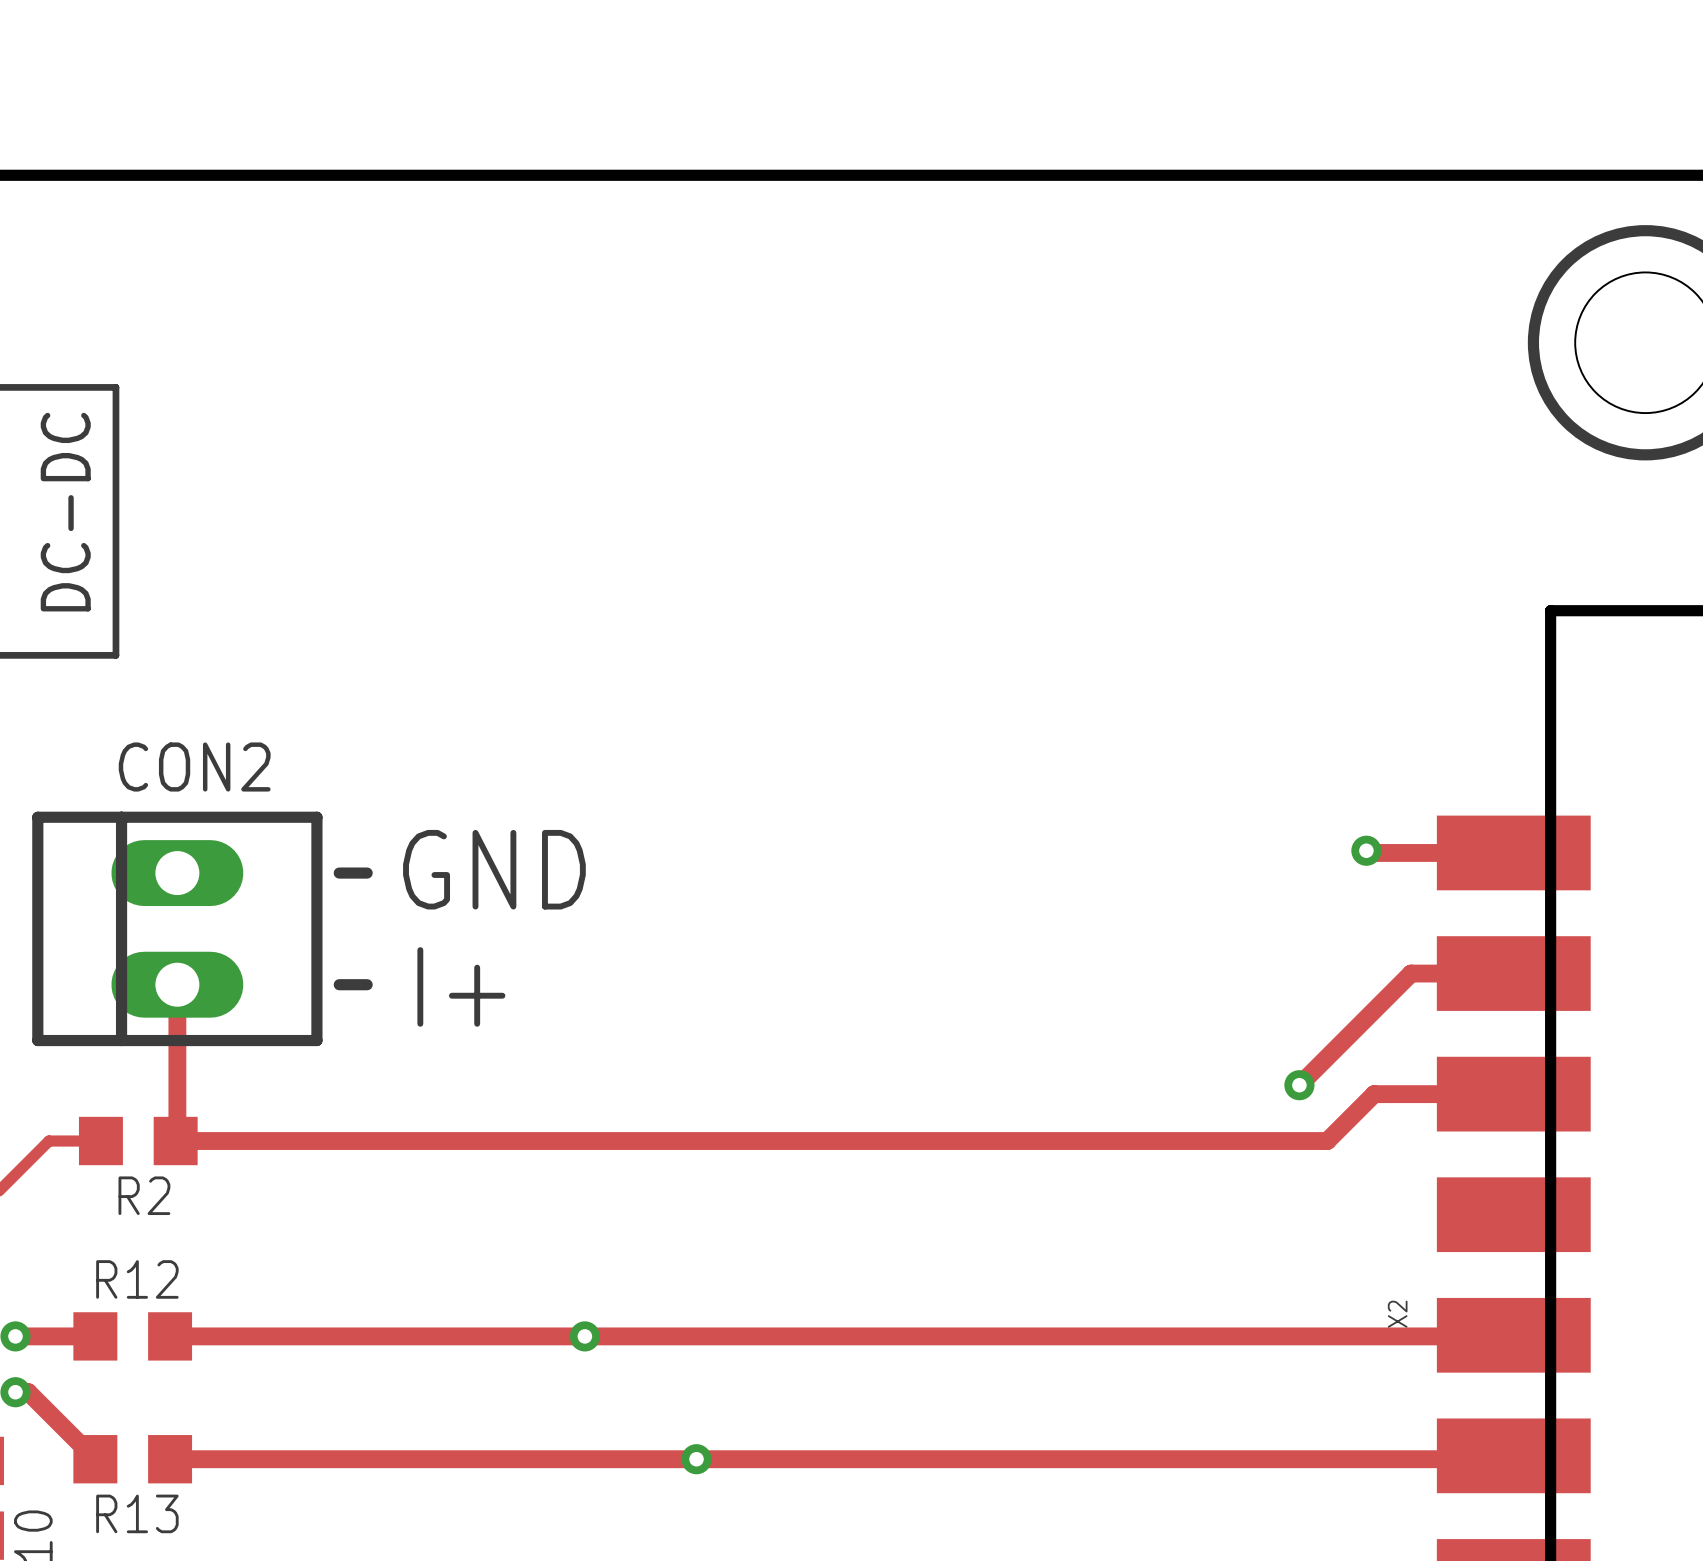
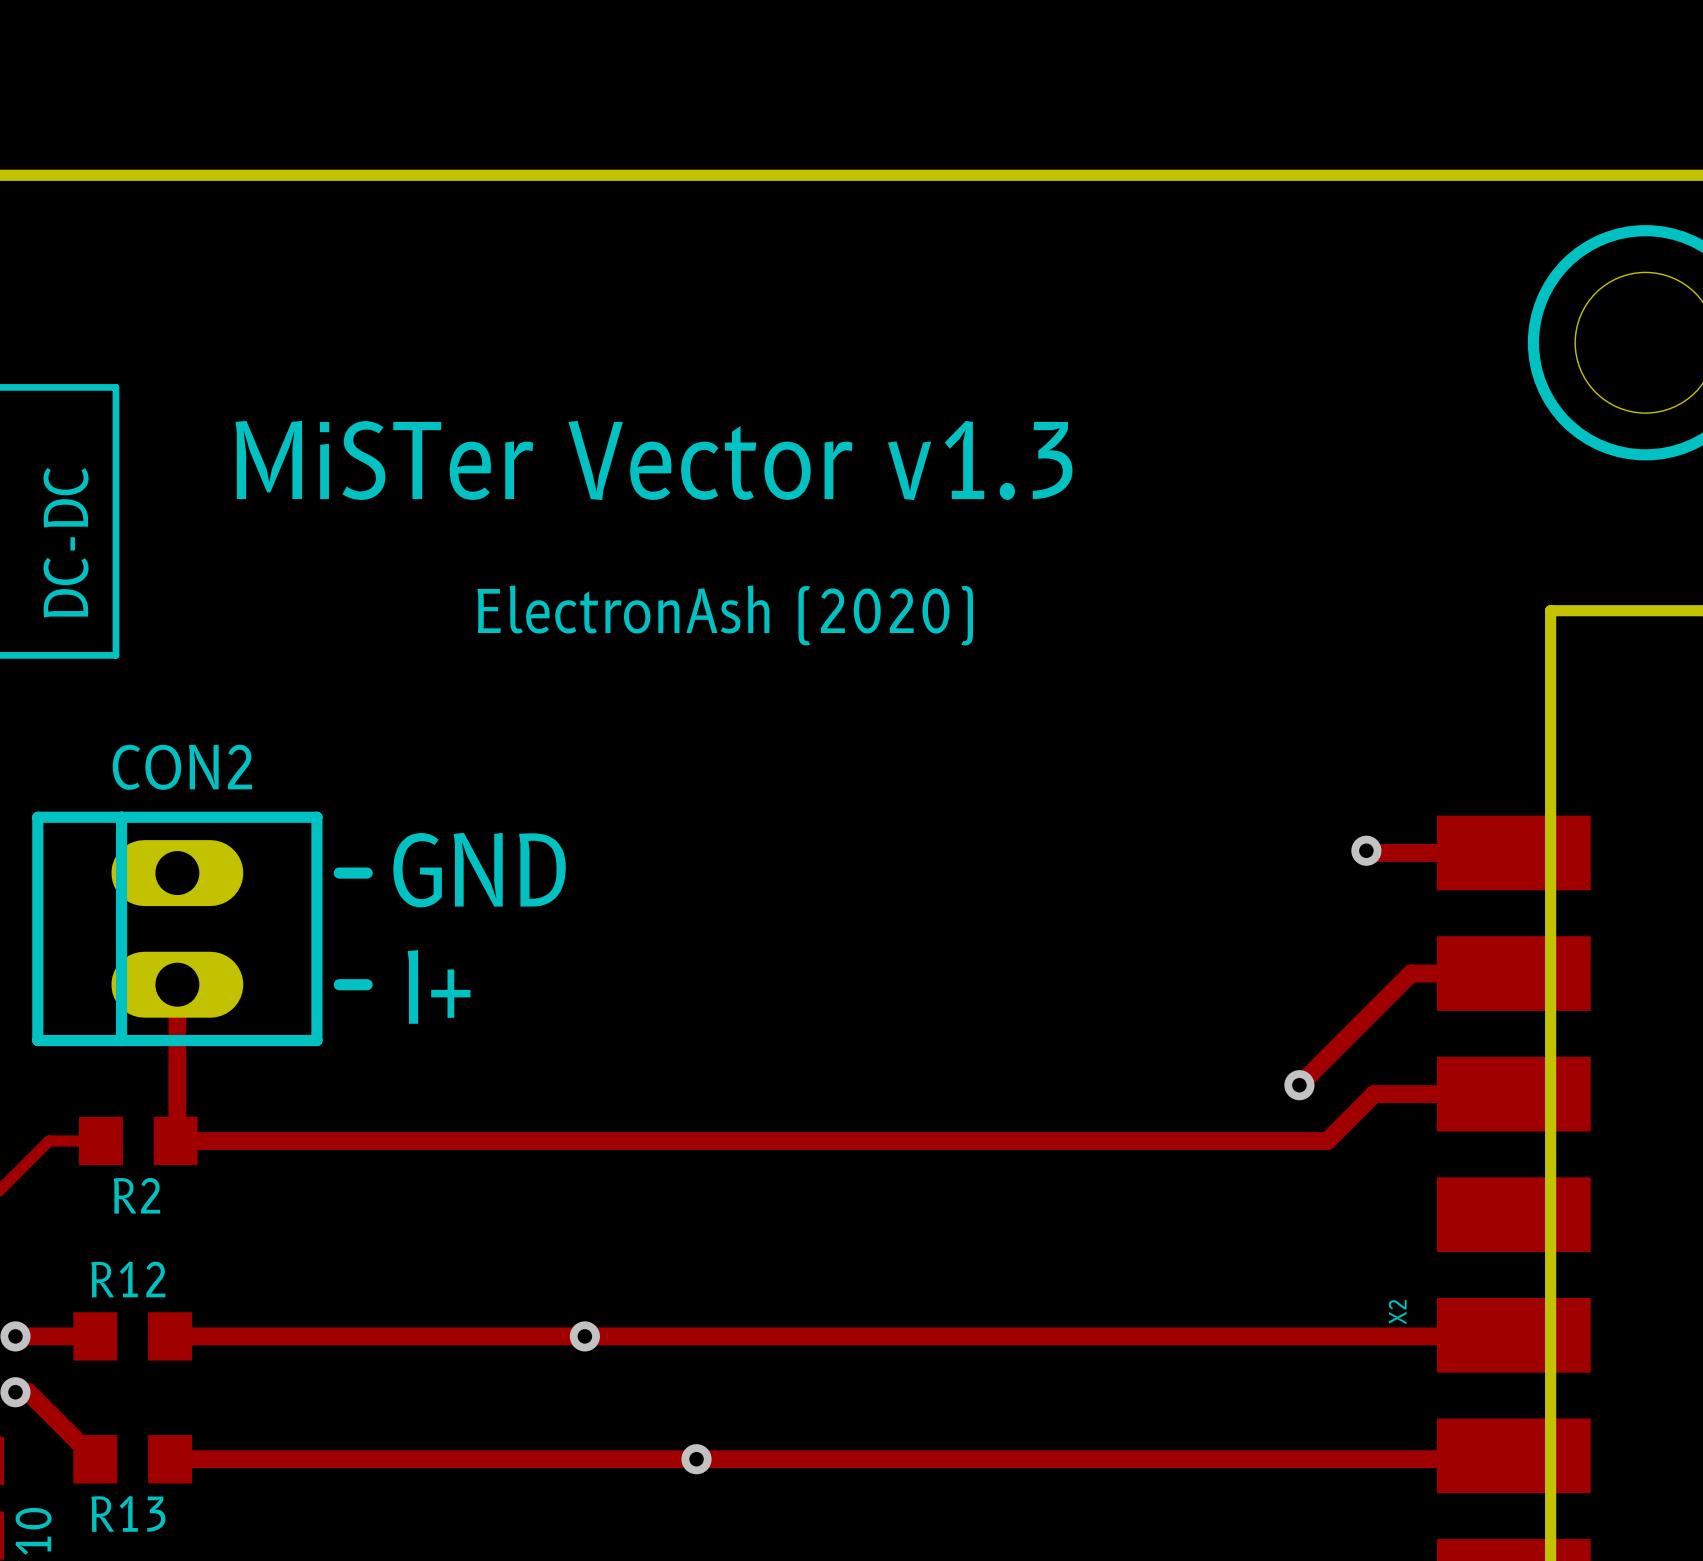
text: none -> MiSTer Vector v1.3 (654, 460)
text: none -> ElectronAsh (2020) (725, 615)

